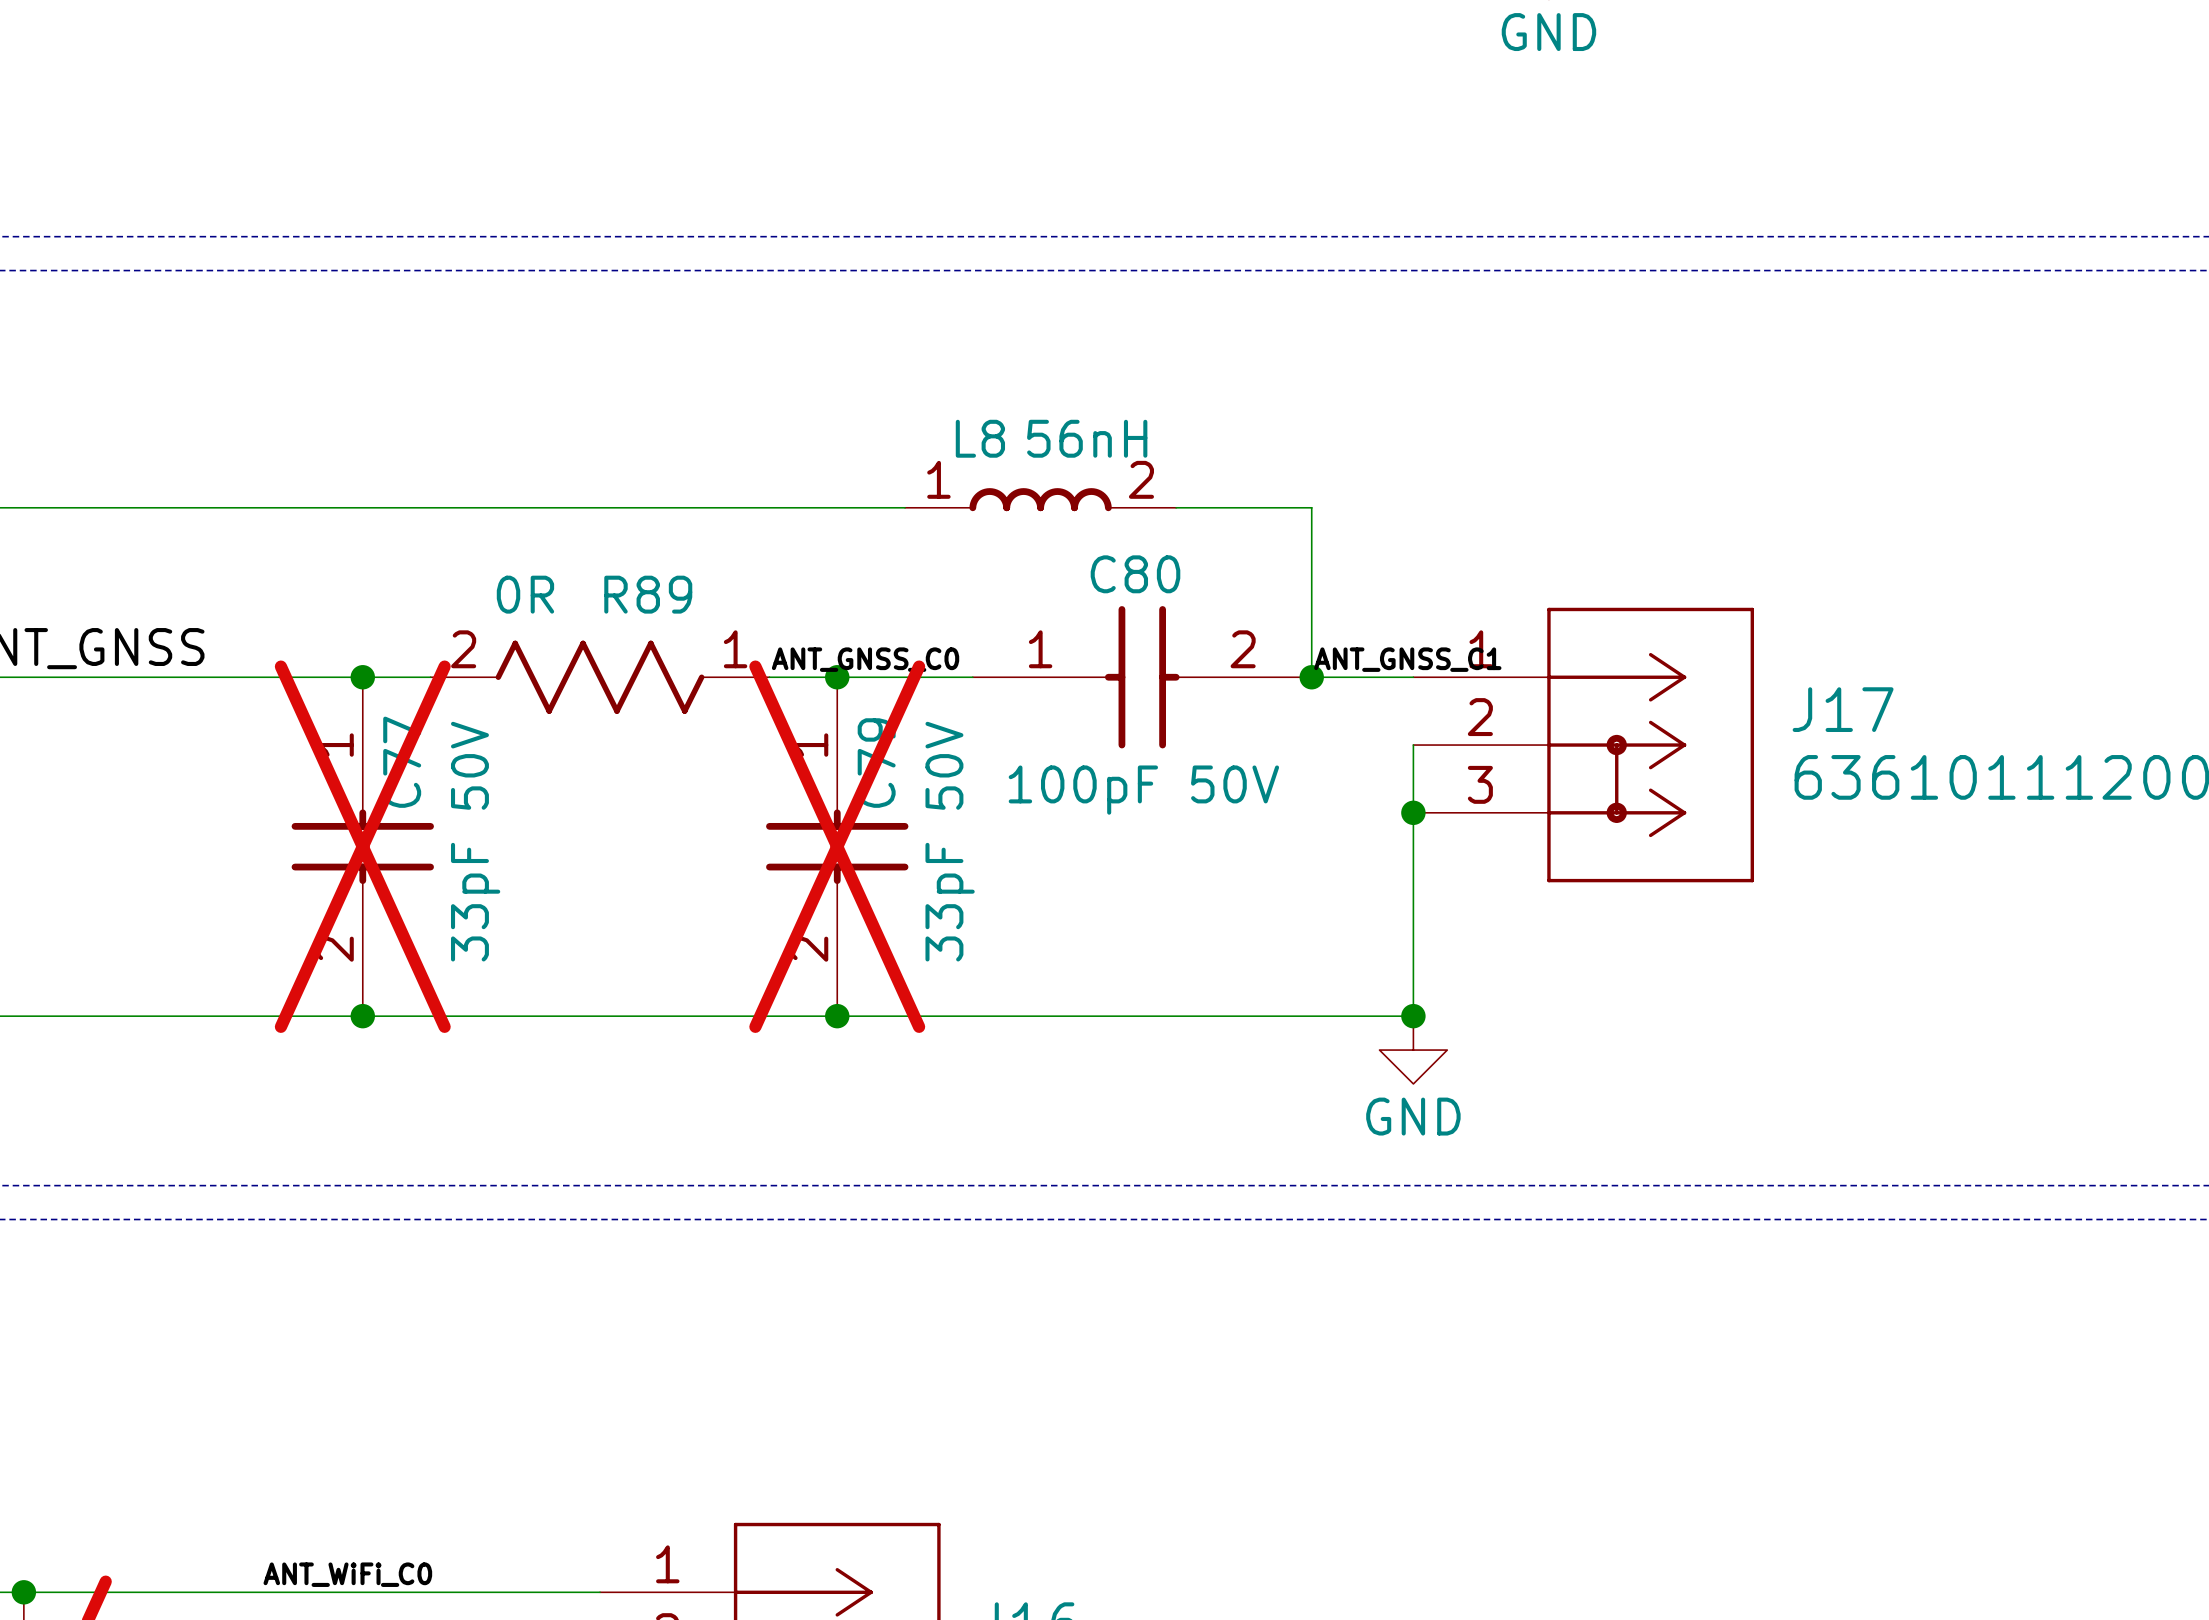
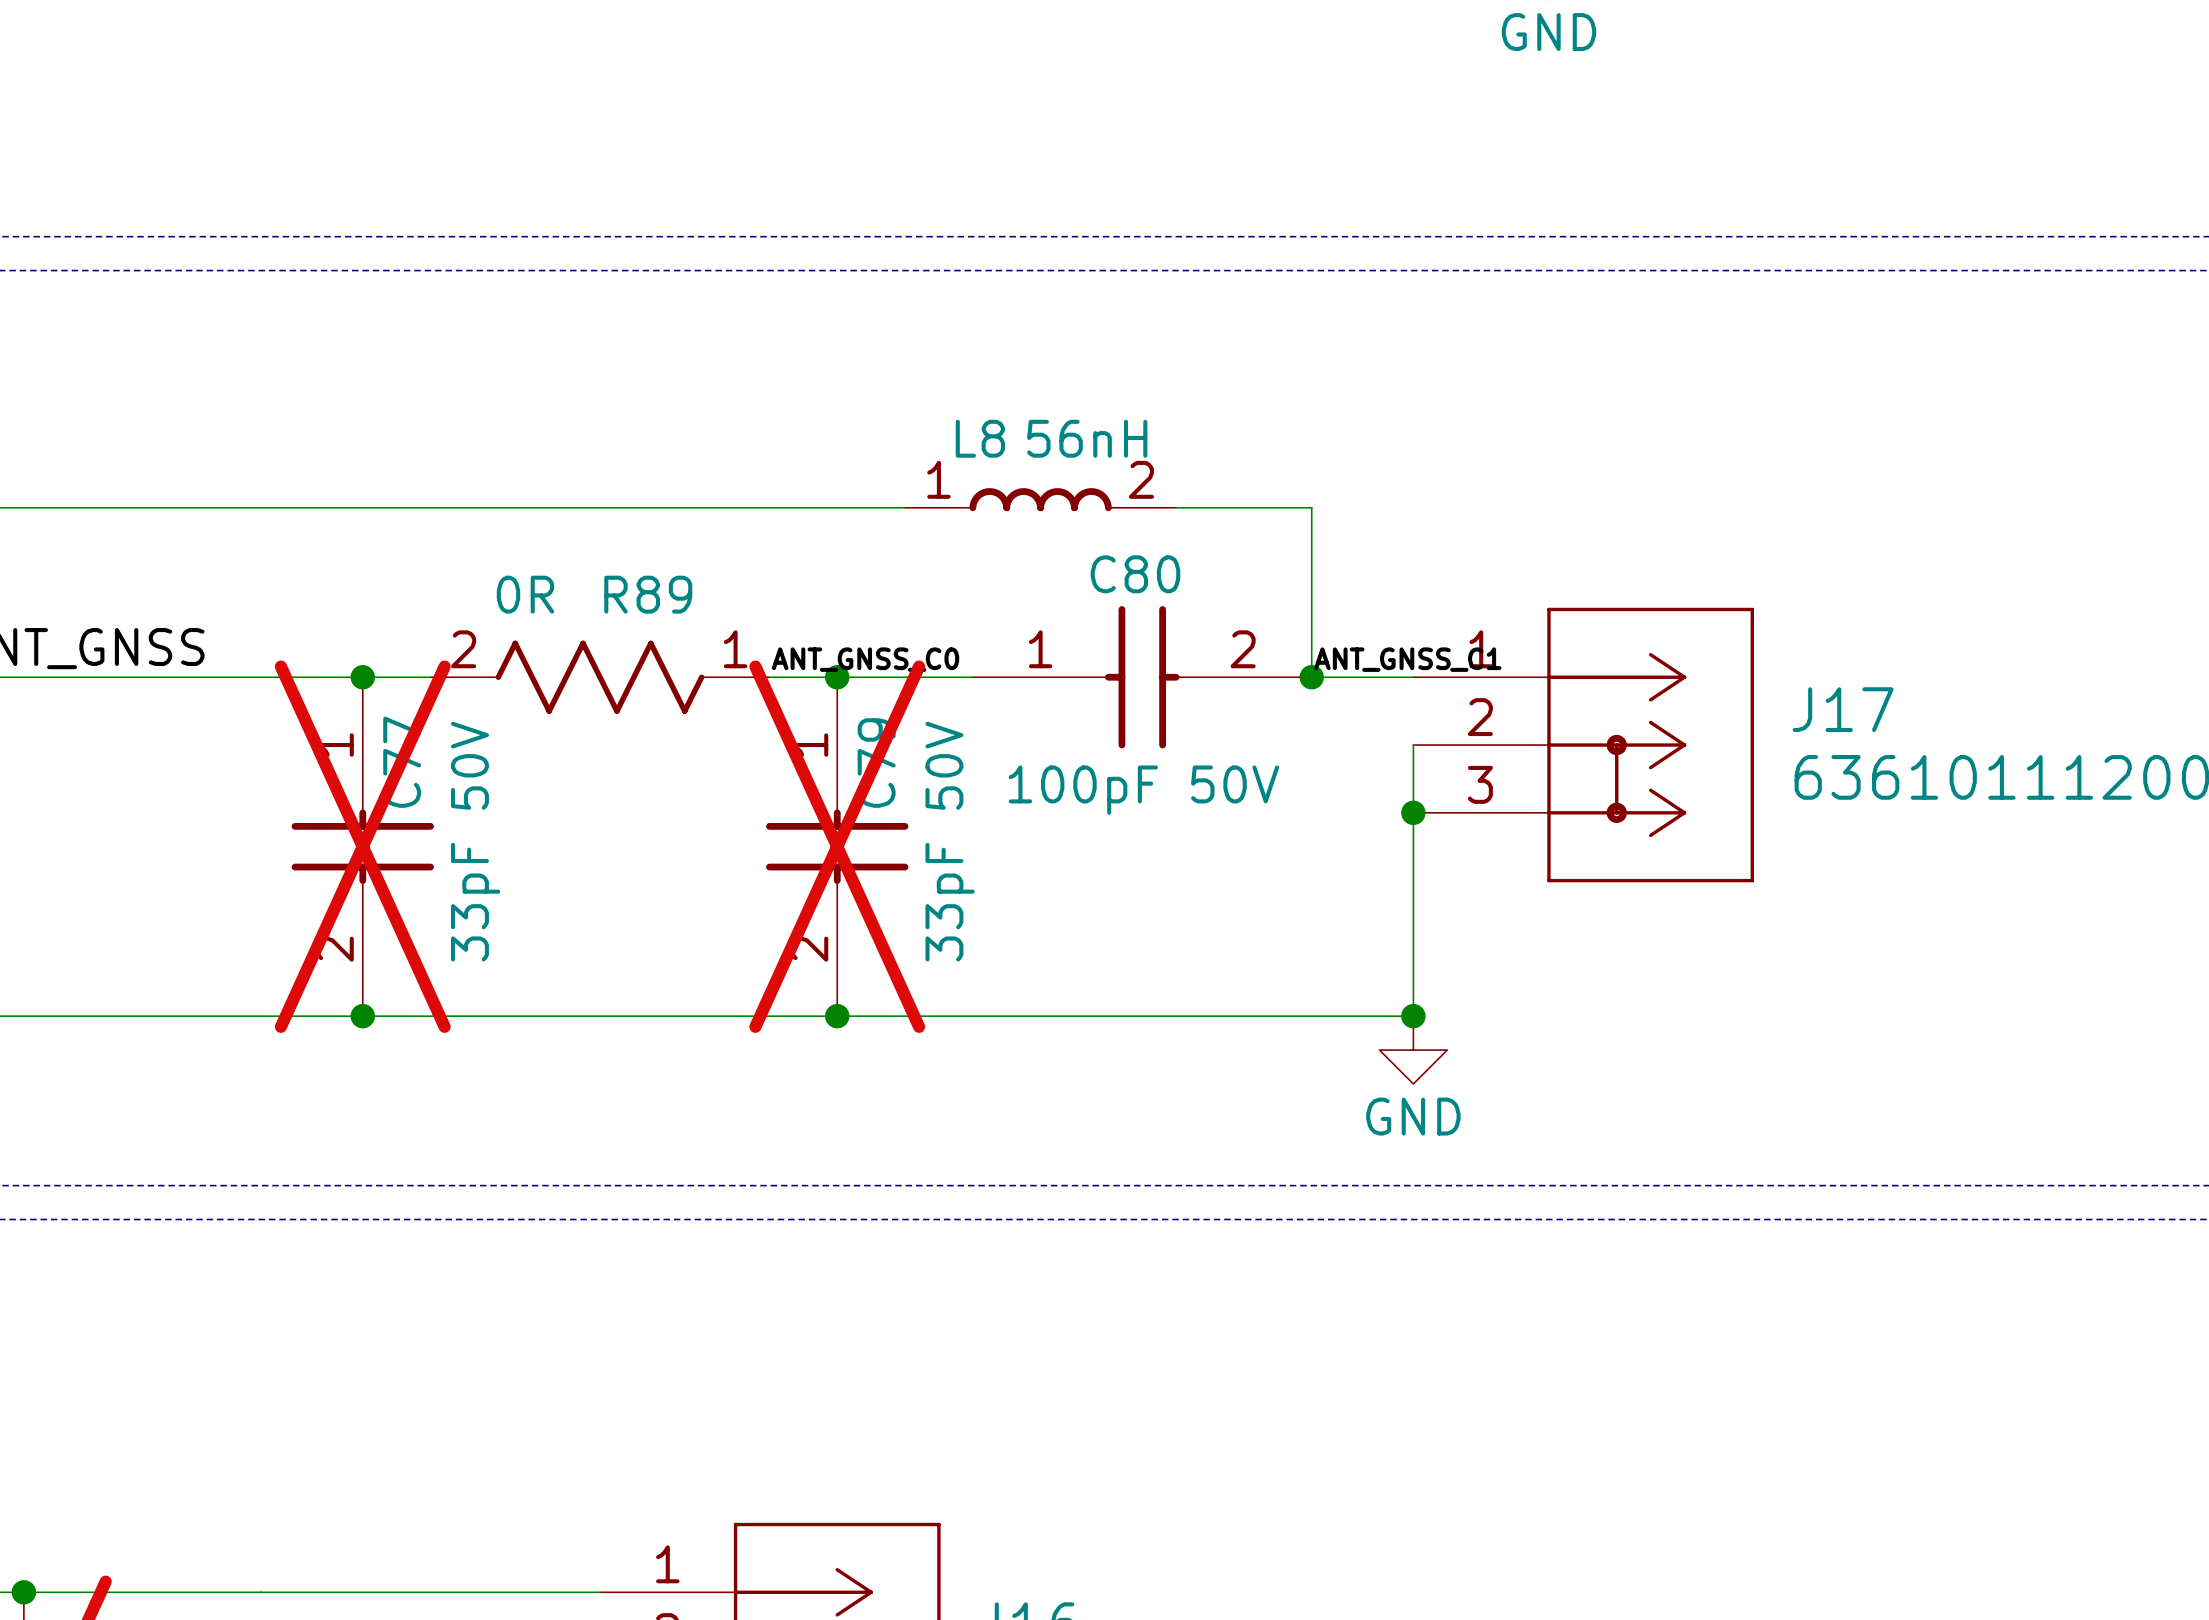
label: ANT_WiFi_C0 (347, 1574) -> none

